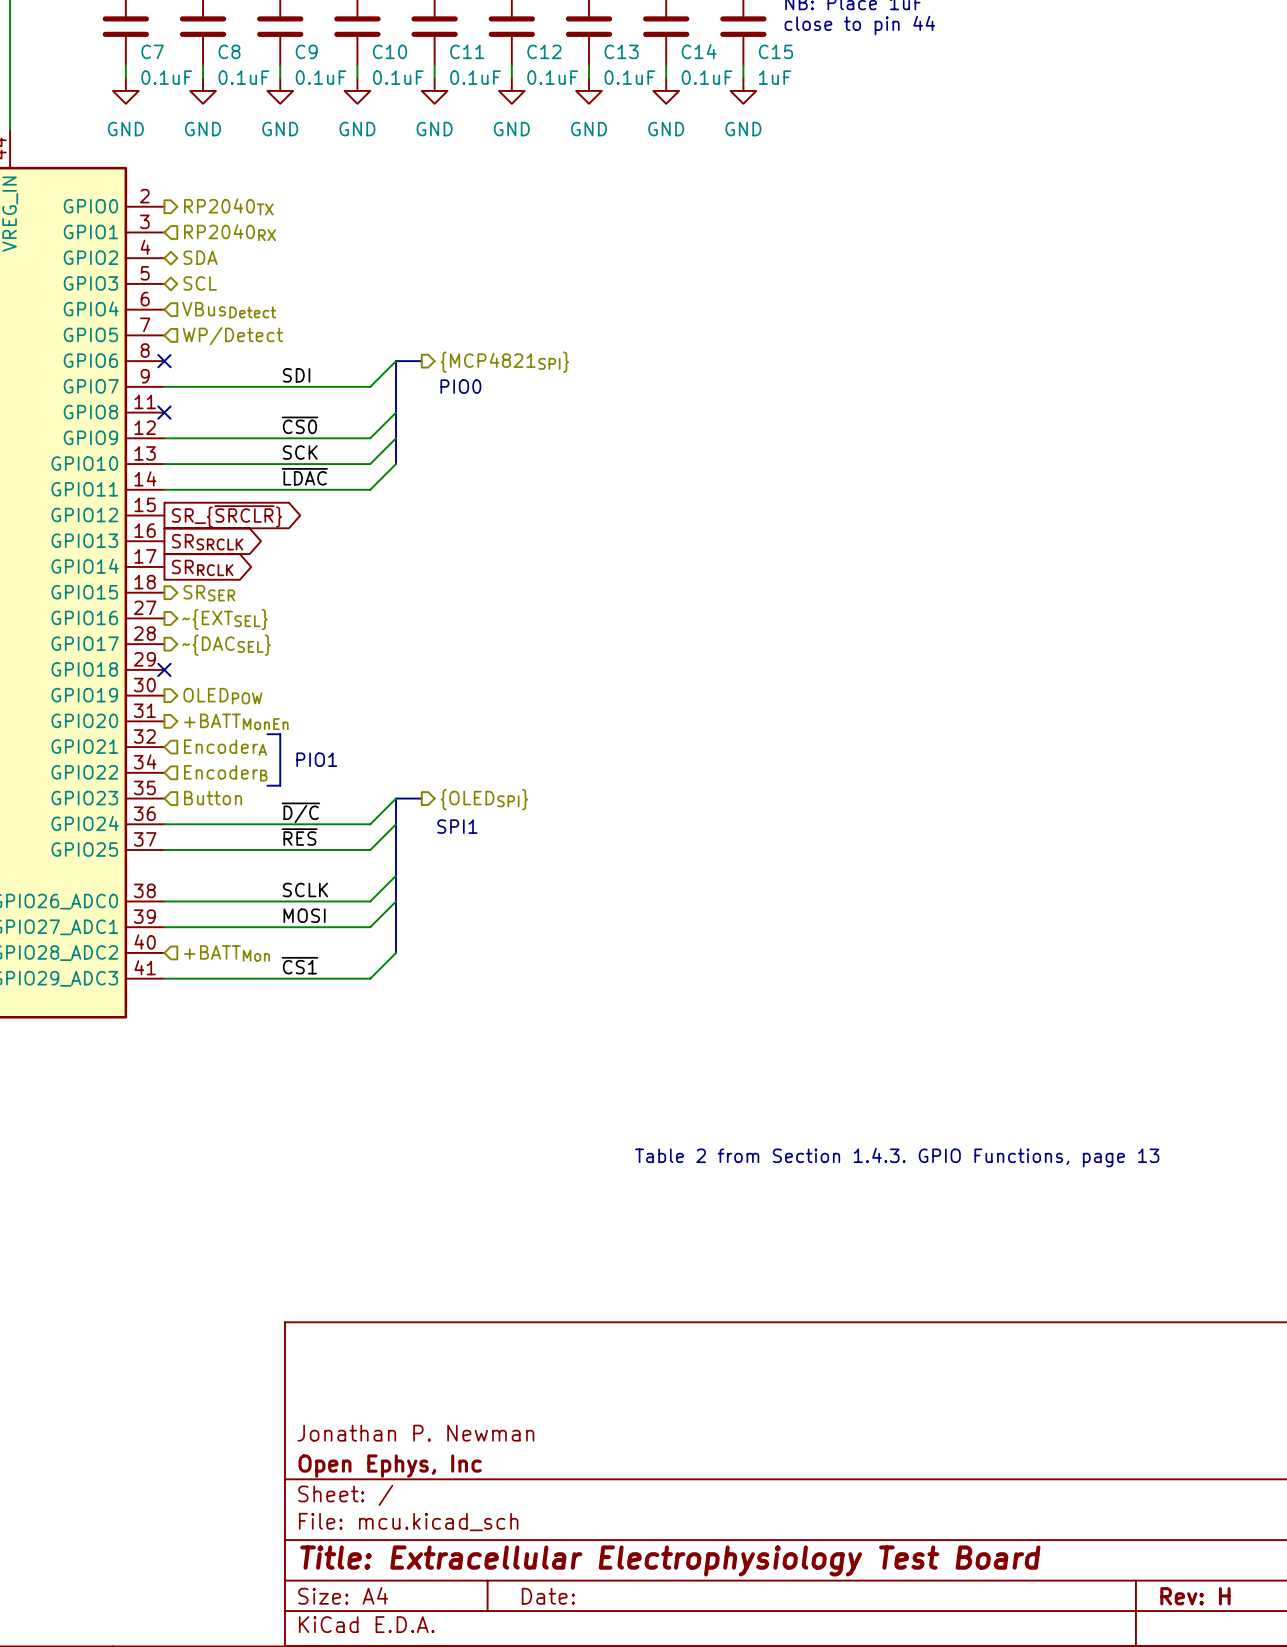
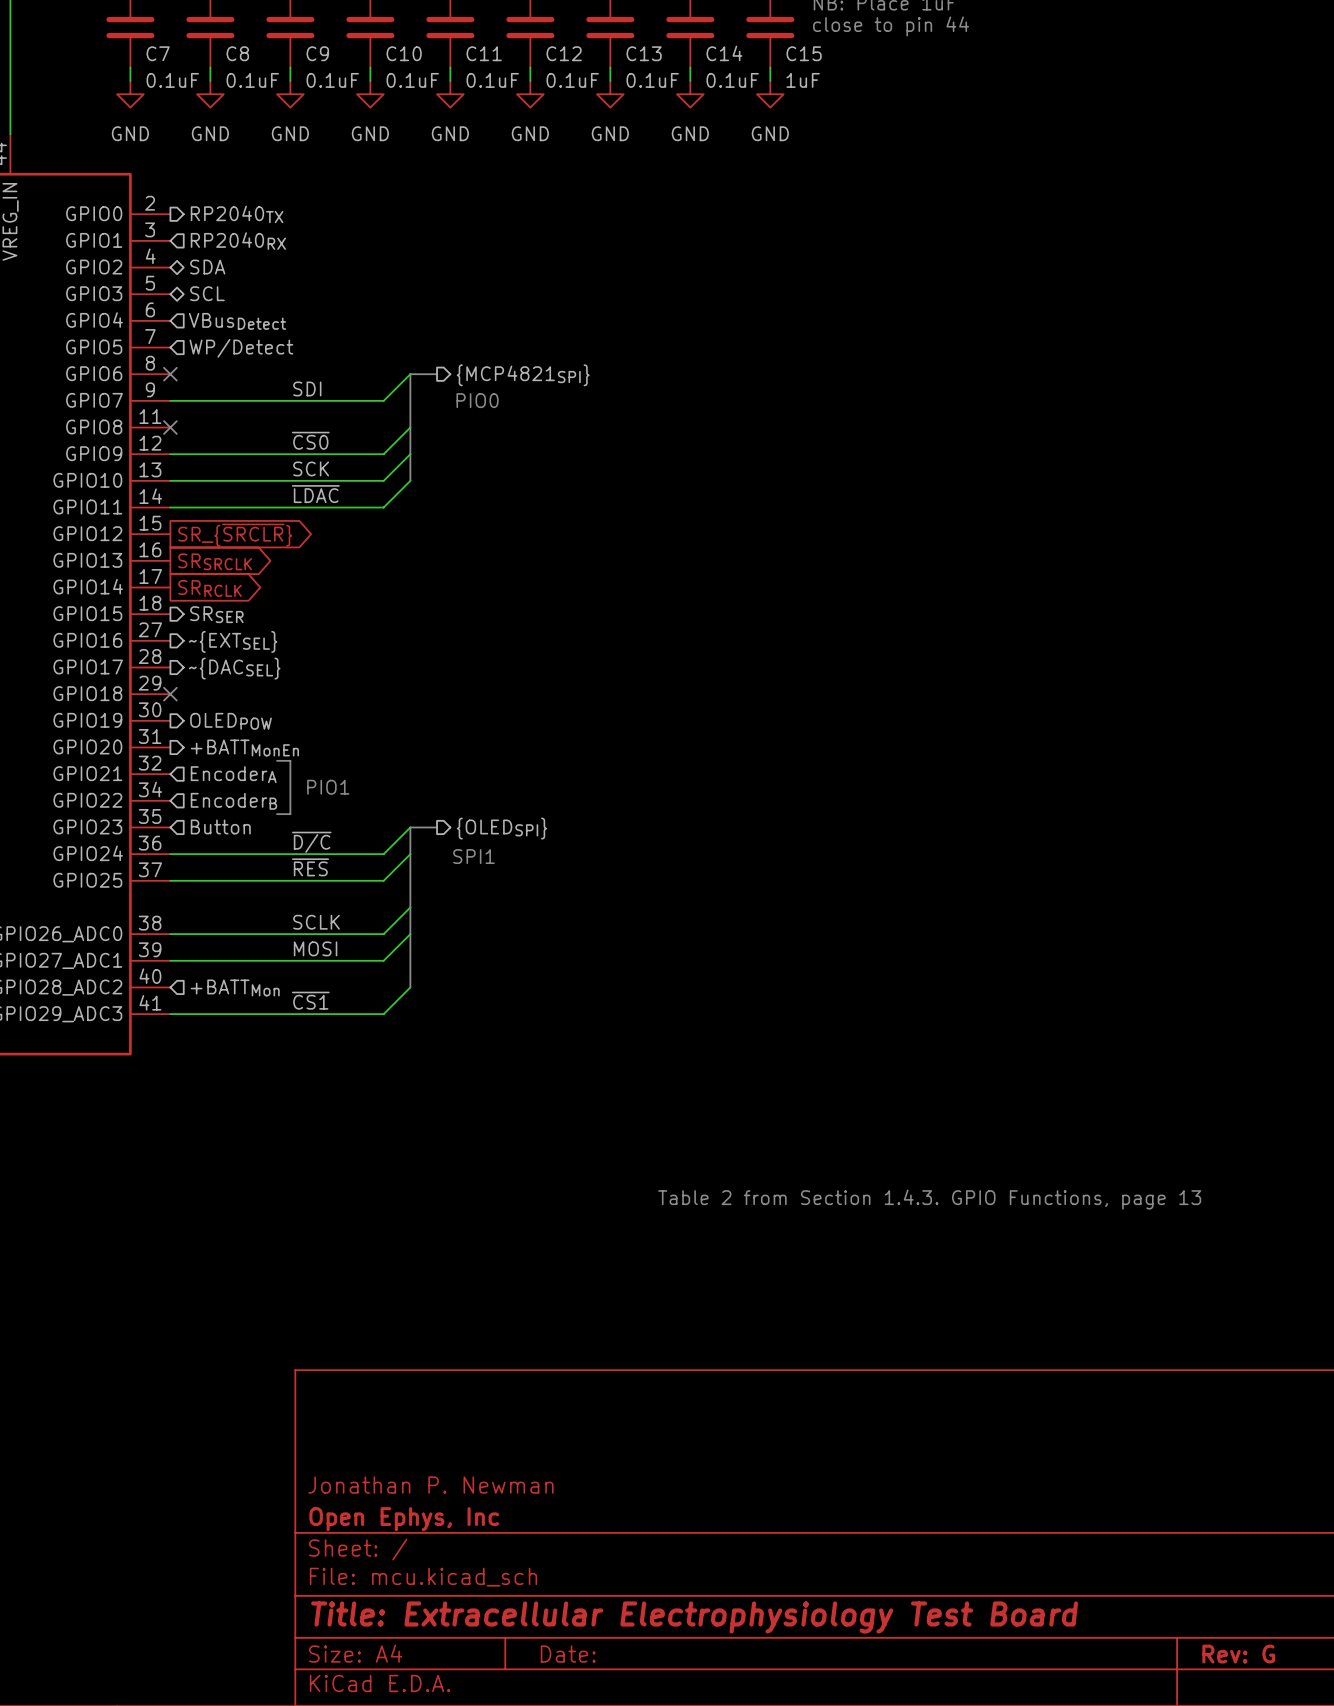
title block: Rev: H (1195, 1596) -> Rev: G (1238, 1654)

